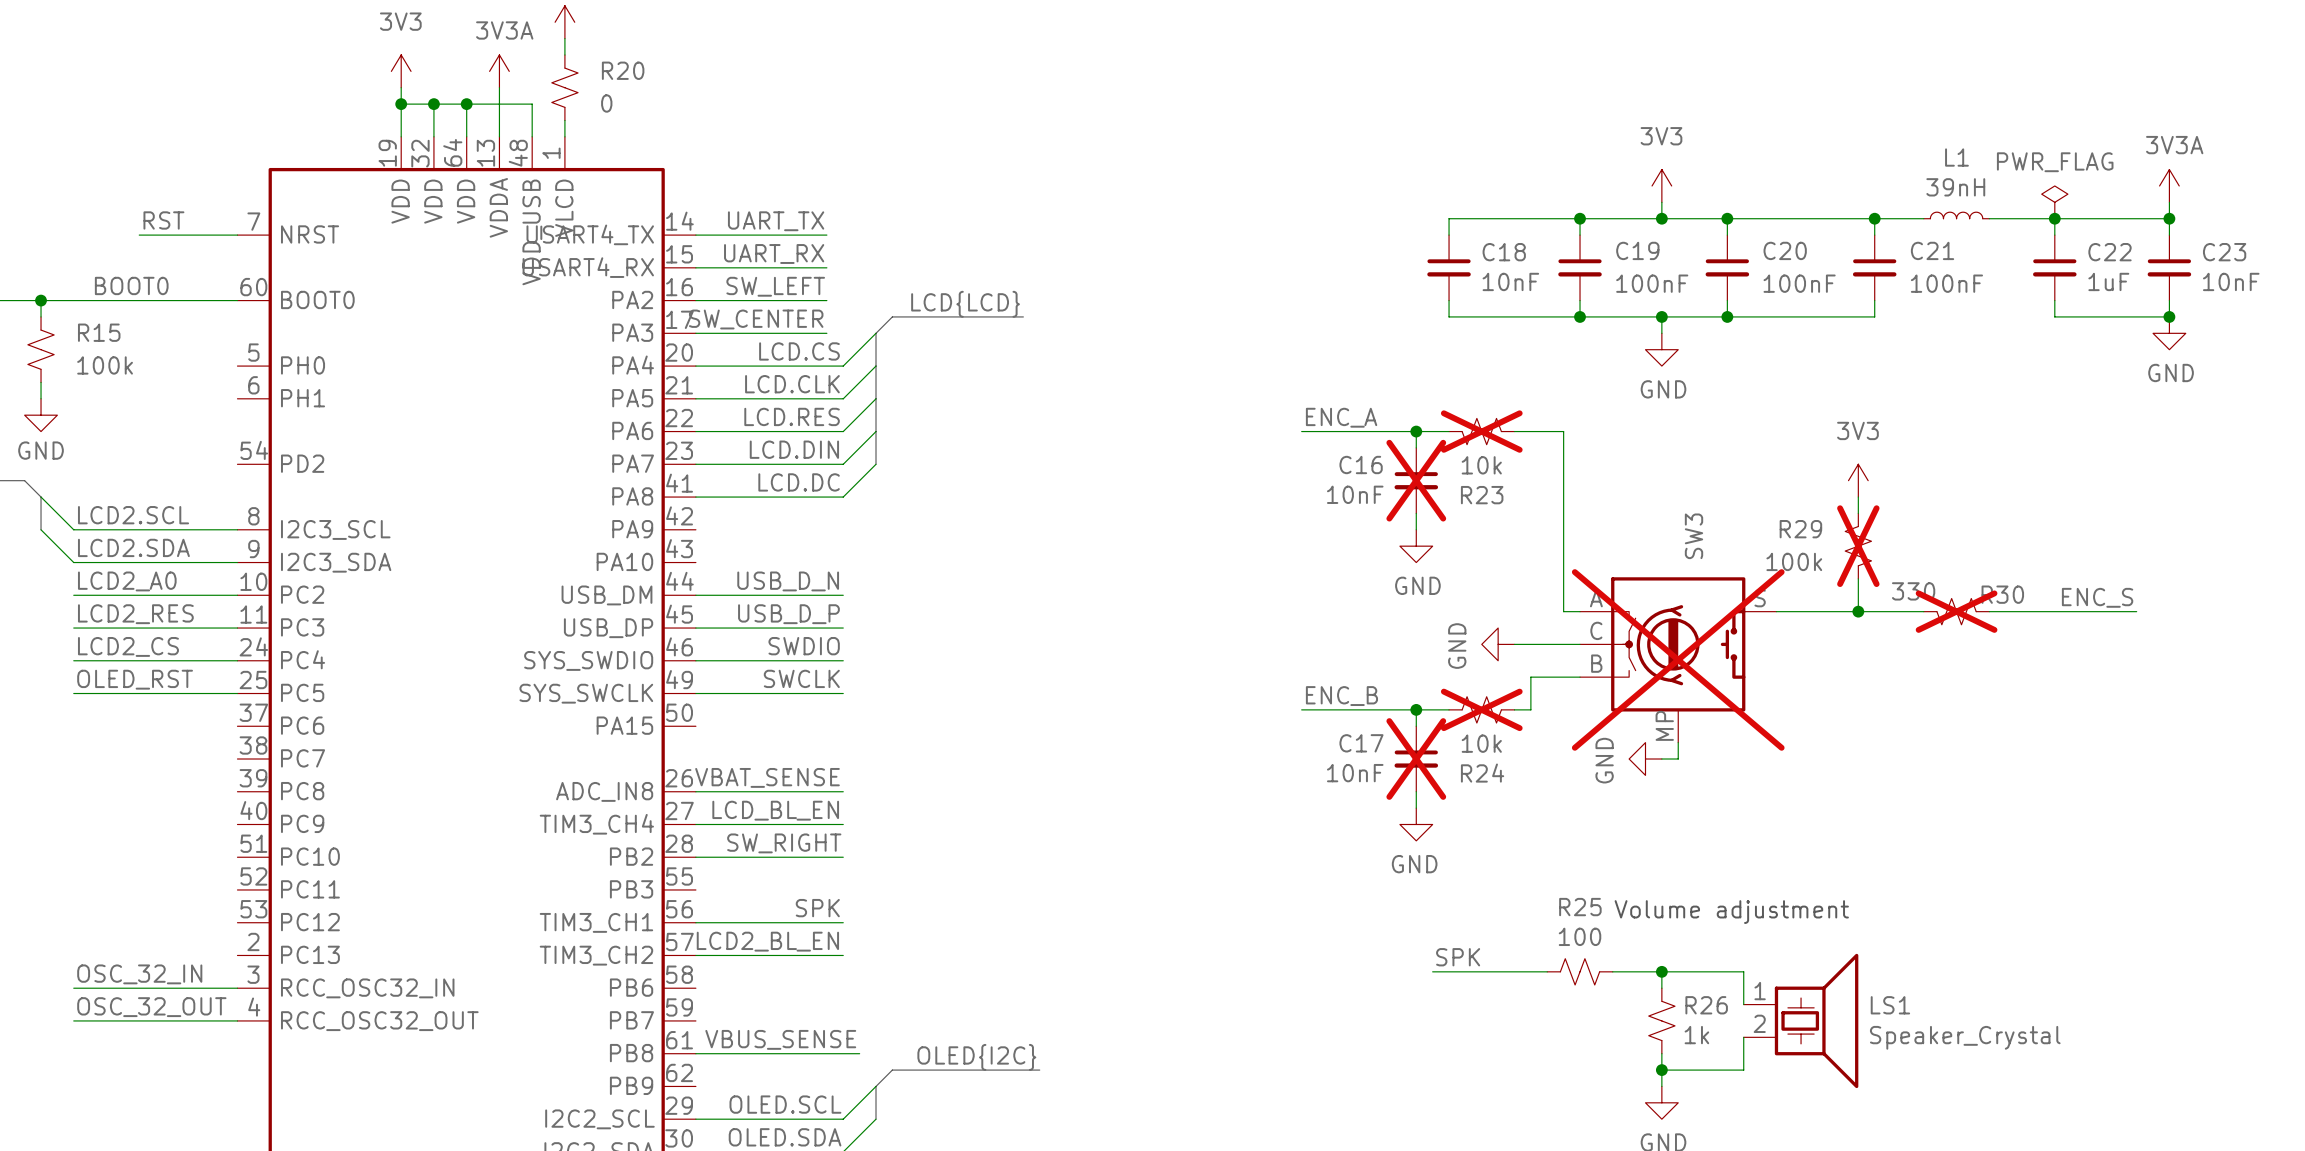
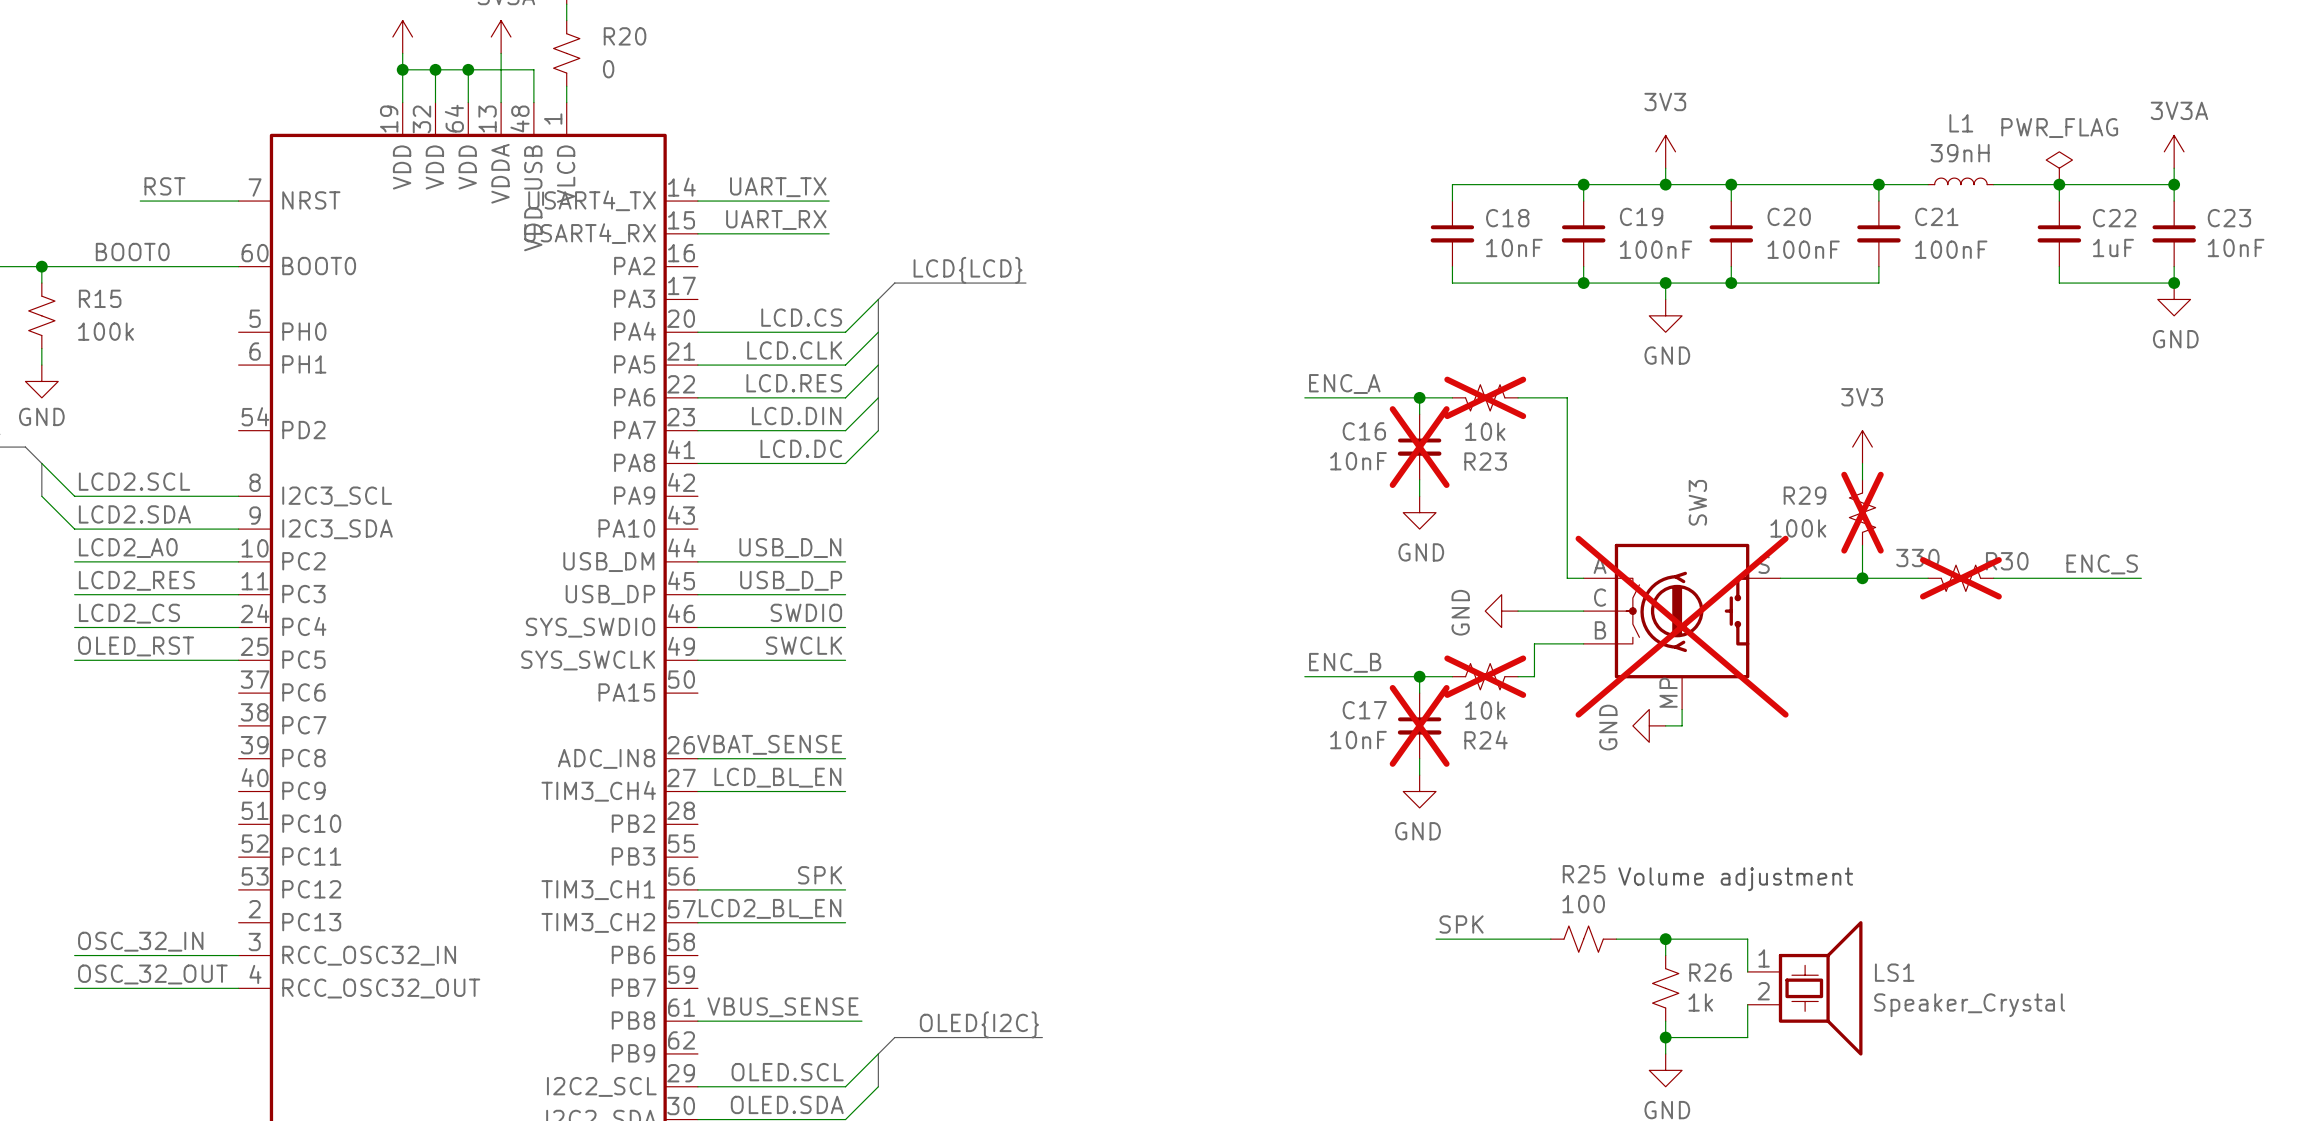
label: SW_LEFT (775, 286) -> none
wire: (695, 300) (826, 300) -> none
label: SW_CENTER (756, 319) -> none
wire: (695, 333) (826, 333) -> none
label: SW_RIGHT (784, 843) -> none
wire: (695, 857) (843, 857) -> none

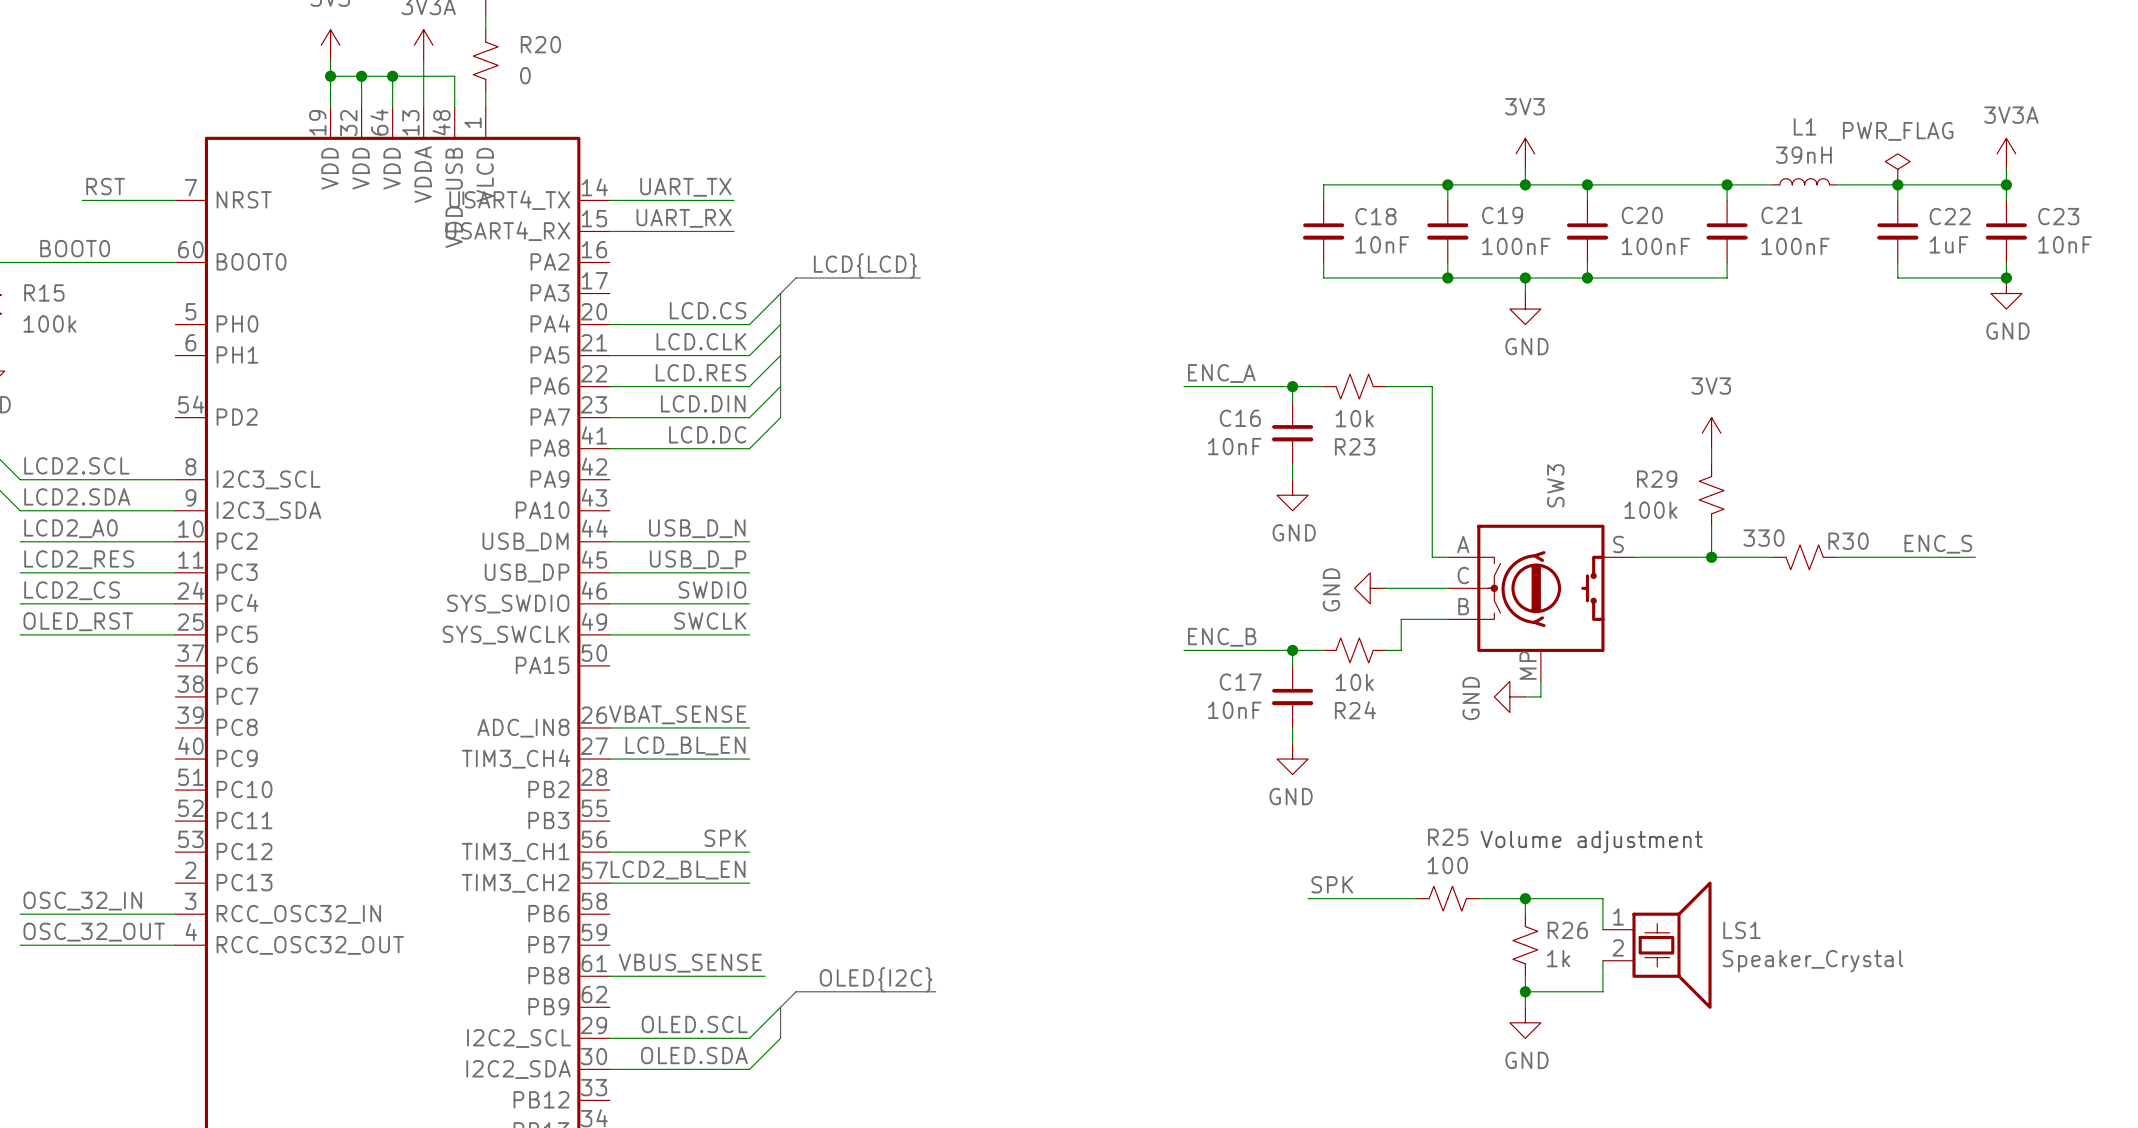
R23 do-not-place cross: (1485, 397) -> none
C16 do-not-place cross: (1419, 447) -> none
R29 do-not-place cross: (1862, 512) -> none
R30 do-not-place cross: (1960, 578) -> none
SW3 do-not-place cross: (1682, 626) -> none
R24 do-not-place cross: (1485, 676) -> none
C17 do-not-place cross: (1419, 725) -> none

